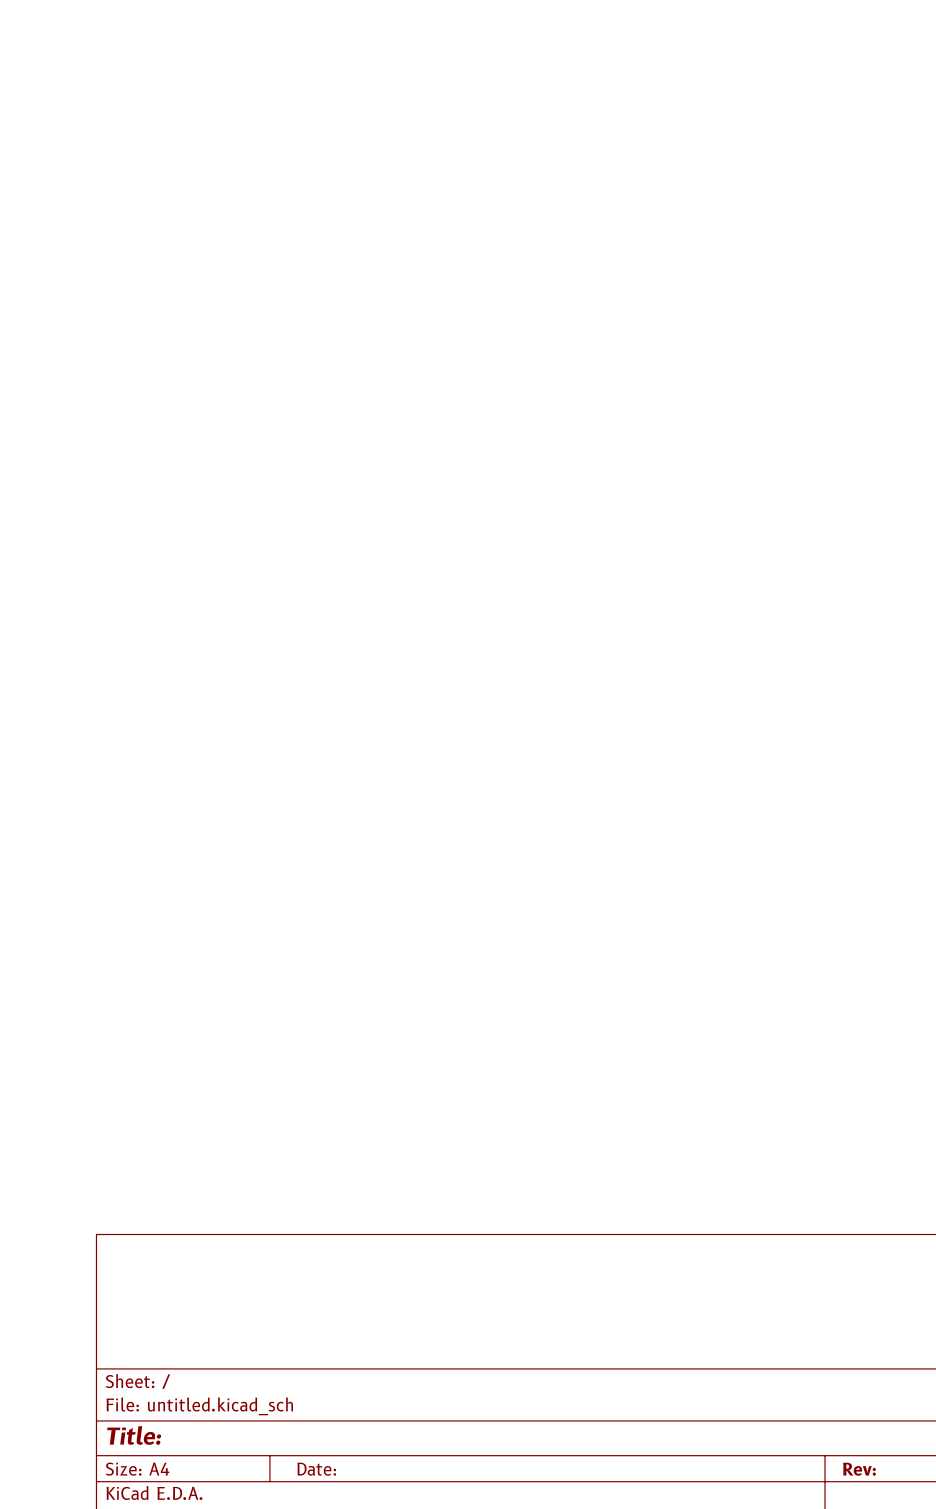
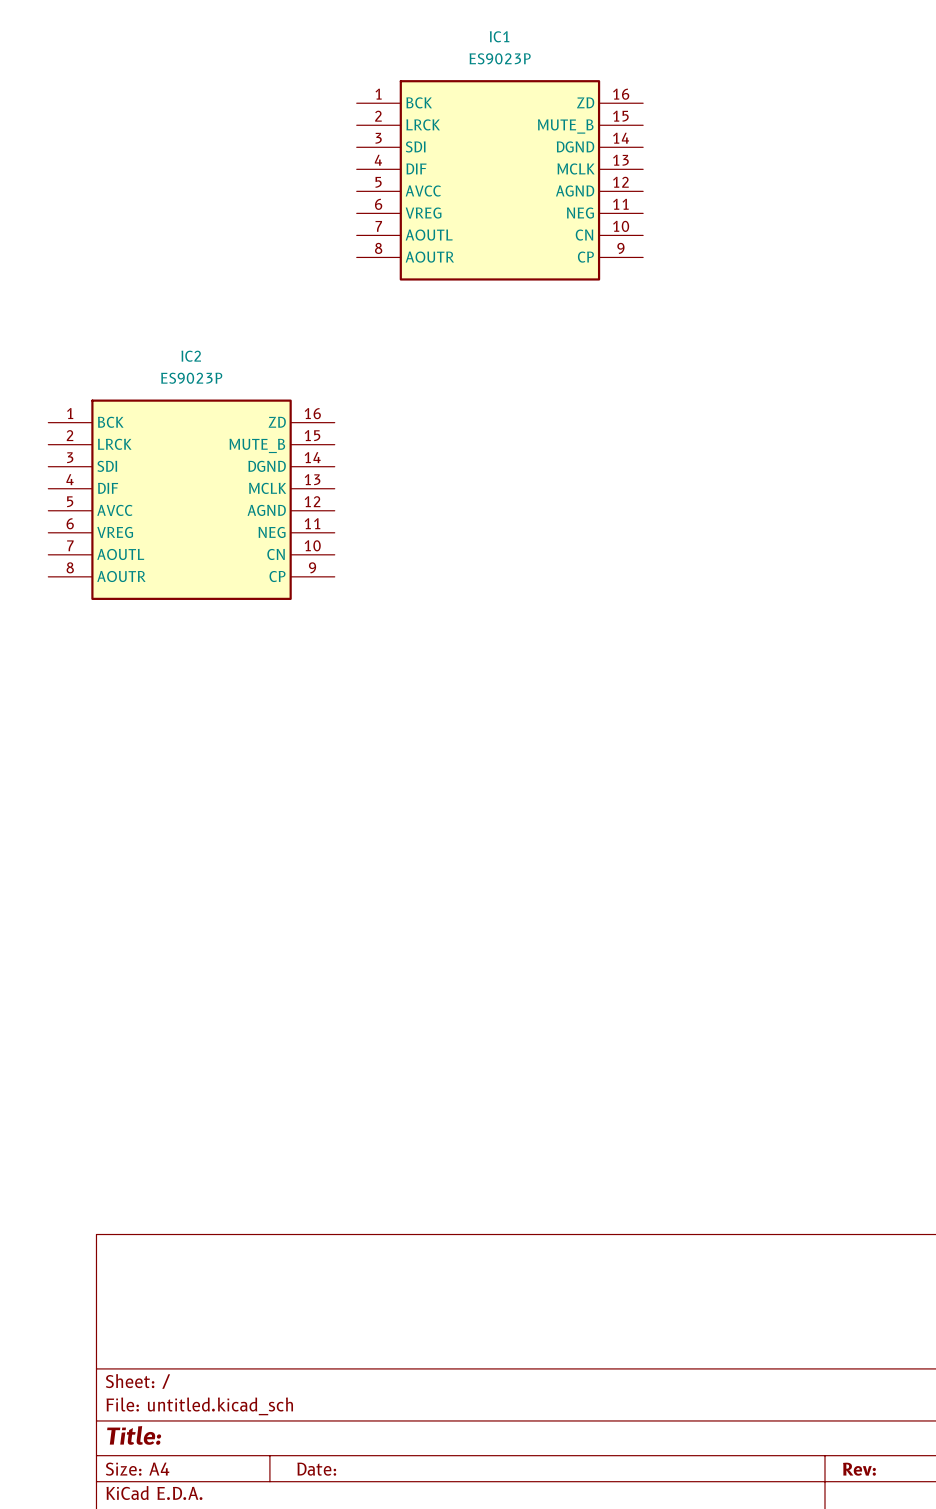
IC1: none -> ES9023P (499, 180)
IC2: none -> ES9023P (191, 499)

